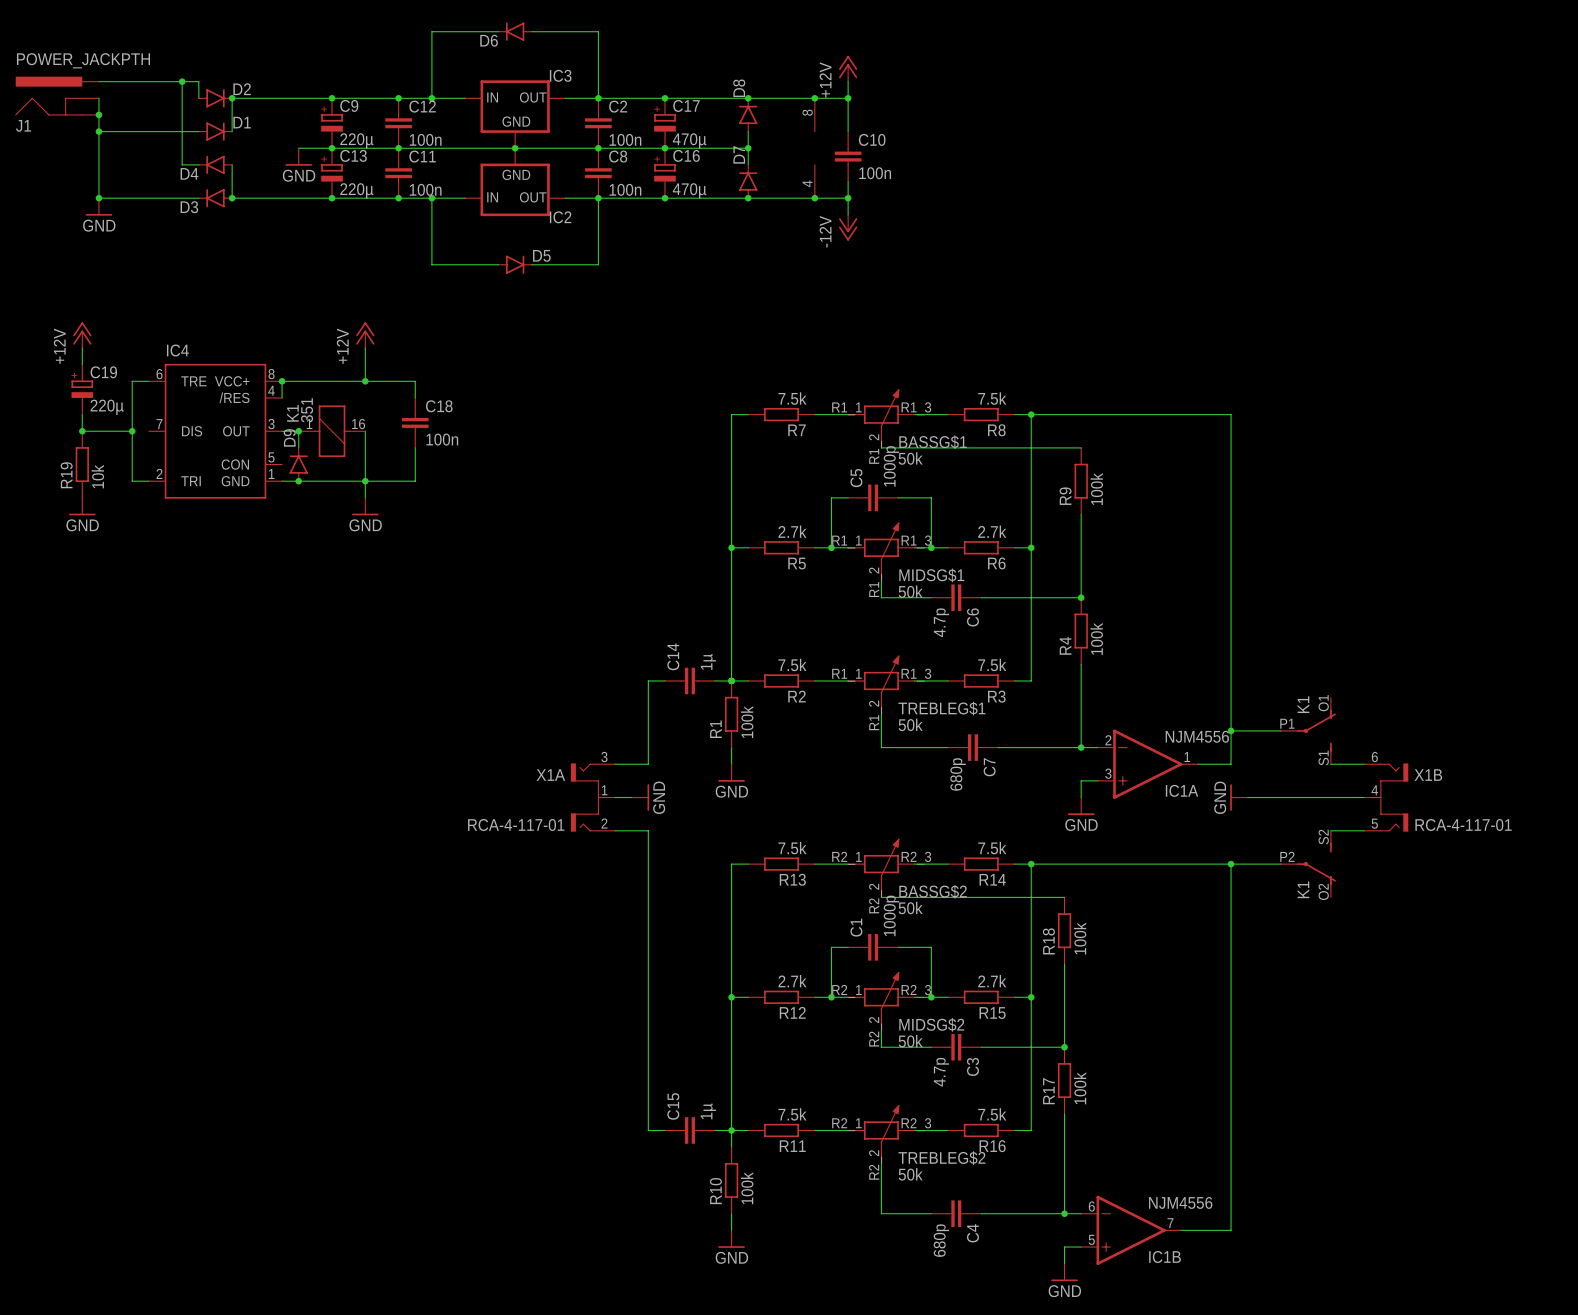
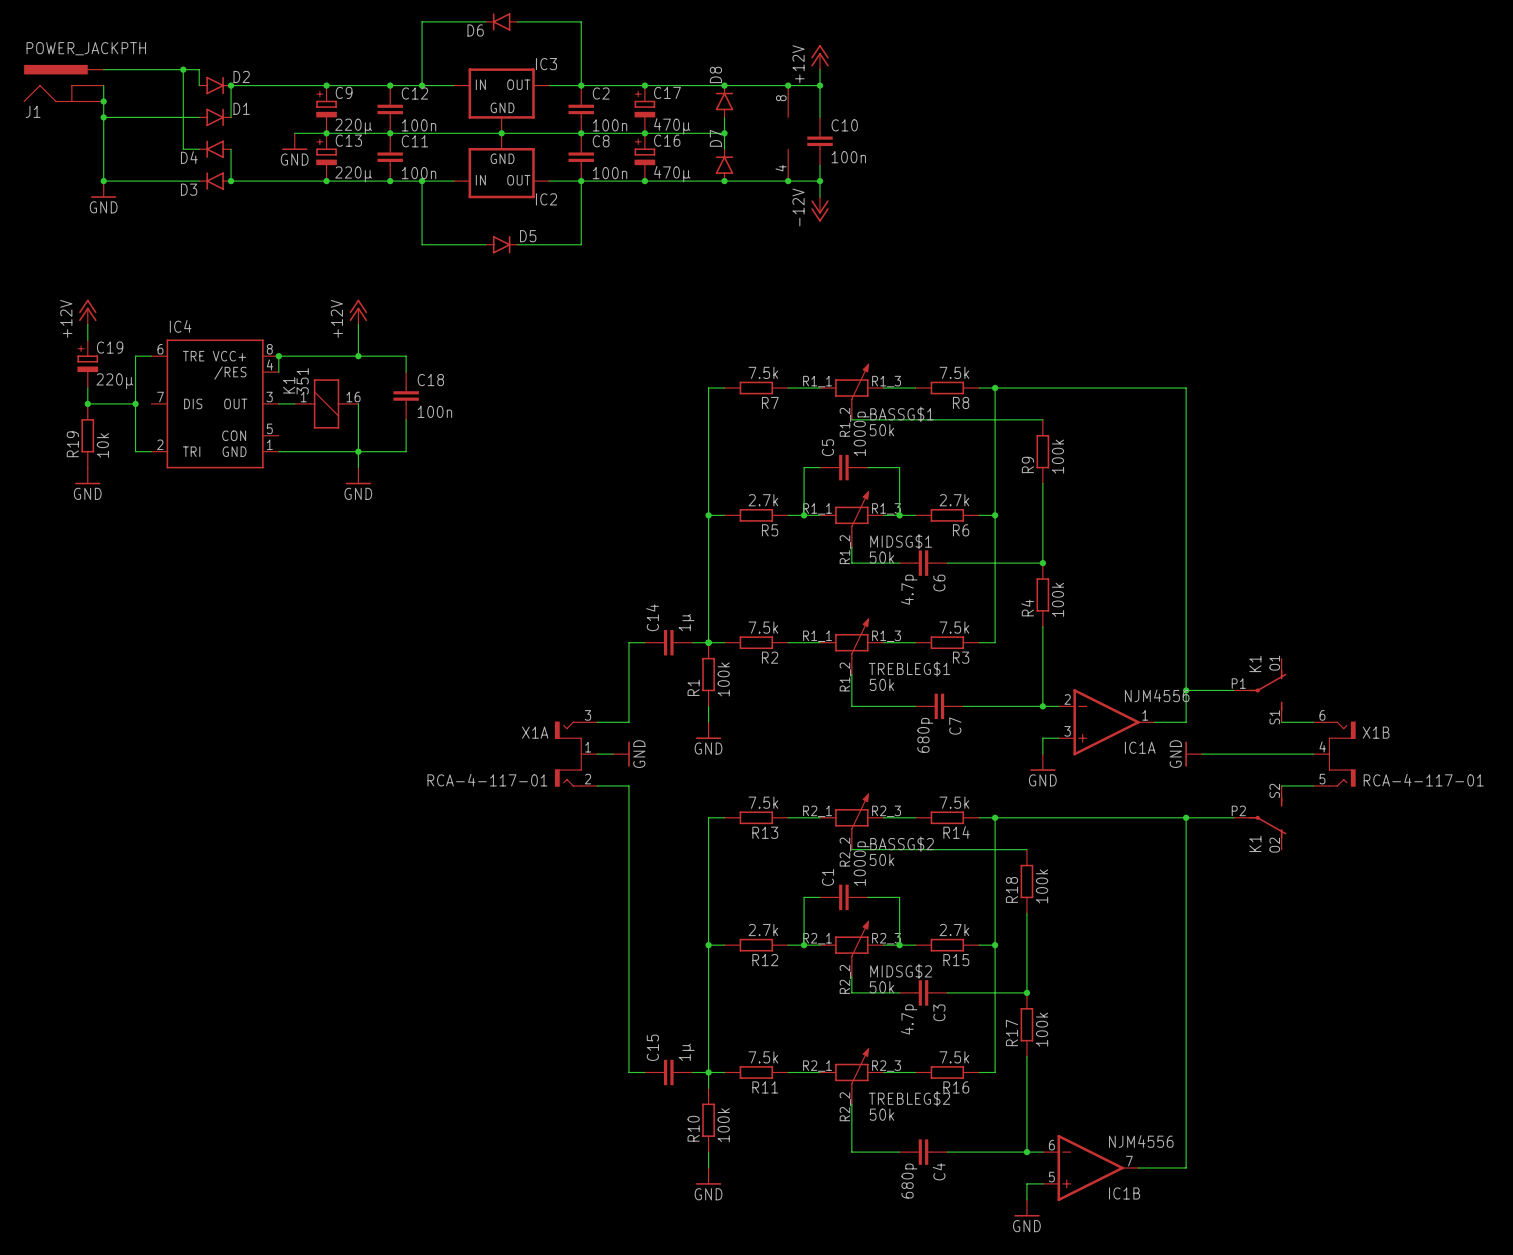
wire: (298, 431) (298, 447) -> none
junction: (298, 431) -> none
D9: (298, 464) -> none
junction: (298, 481) -> none

